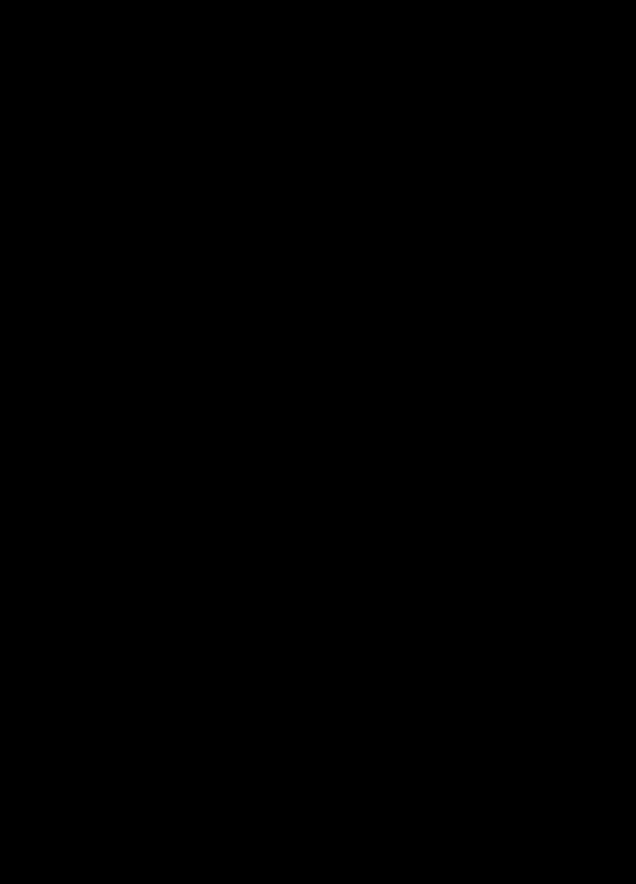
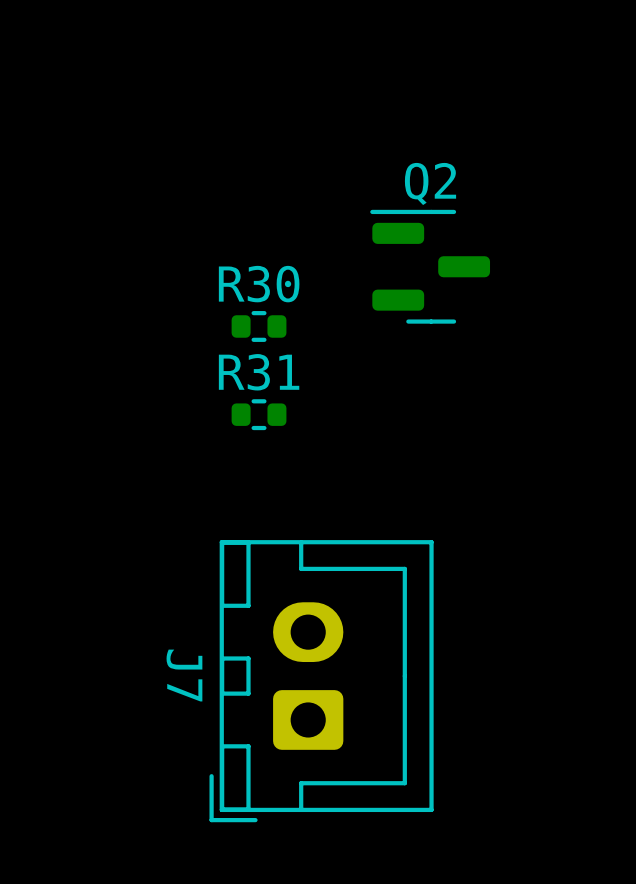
Q2: none -> (430, 266)
R30: none -> (259, 326)
R31: none -> (259, 414)
J7: none -> (321, 681)

